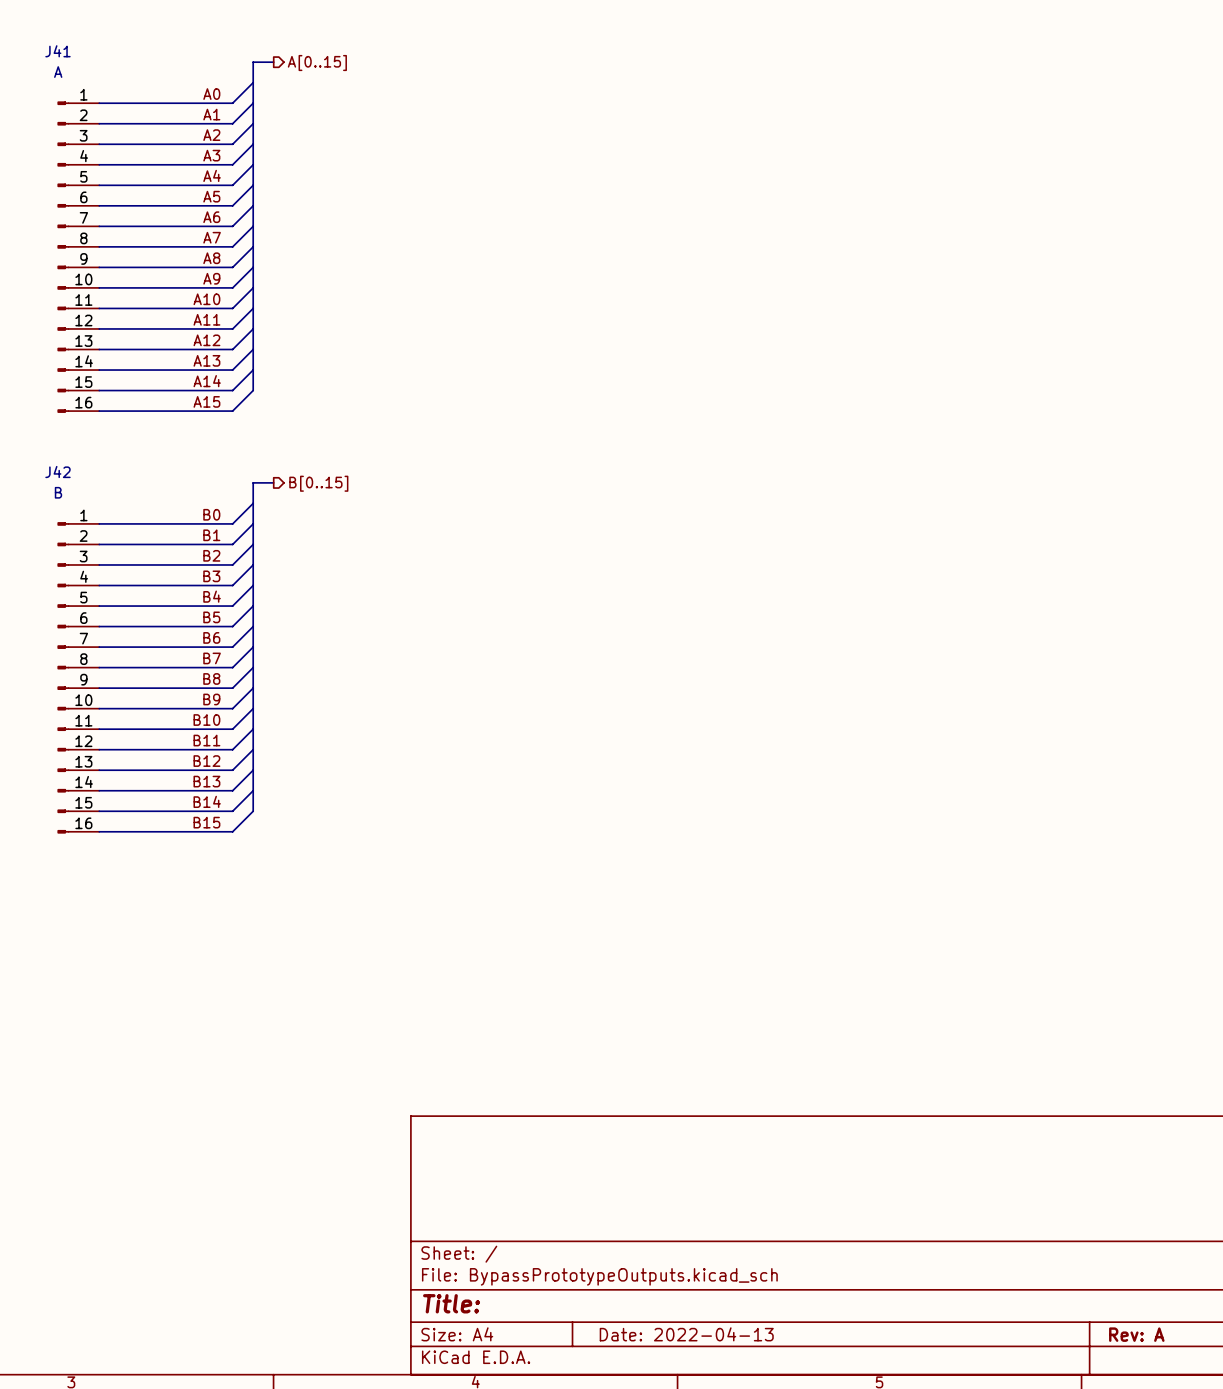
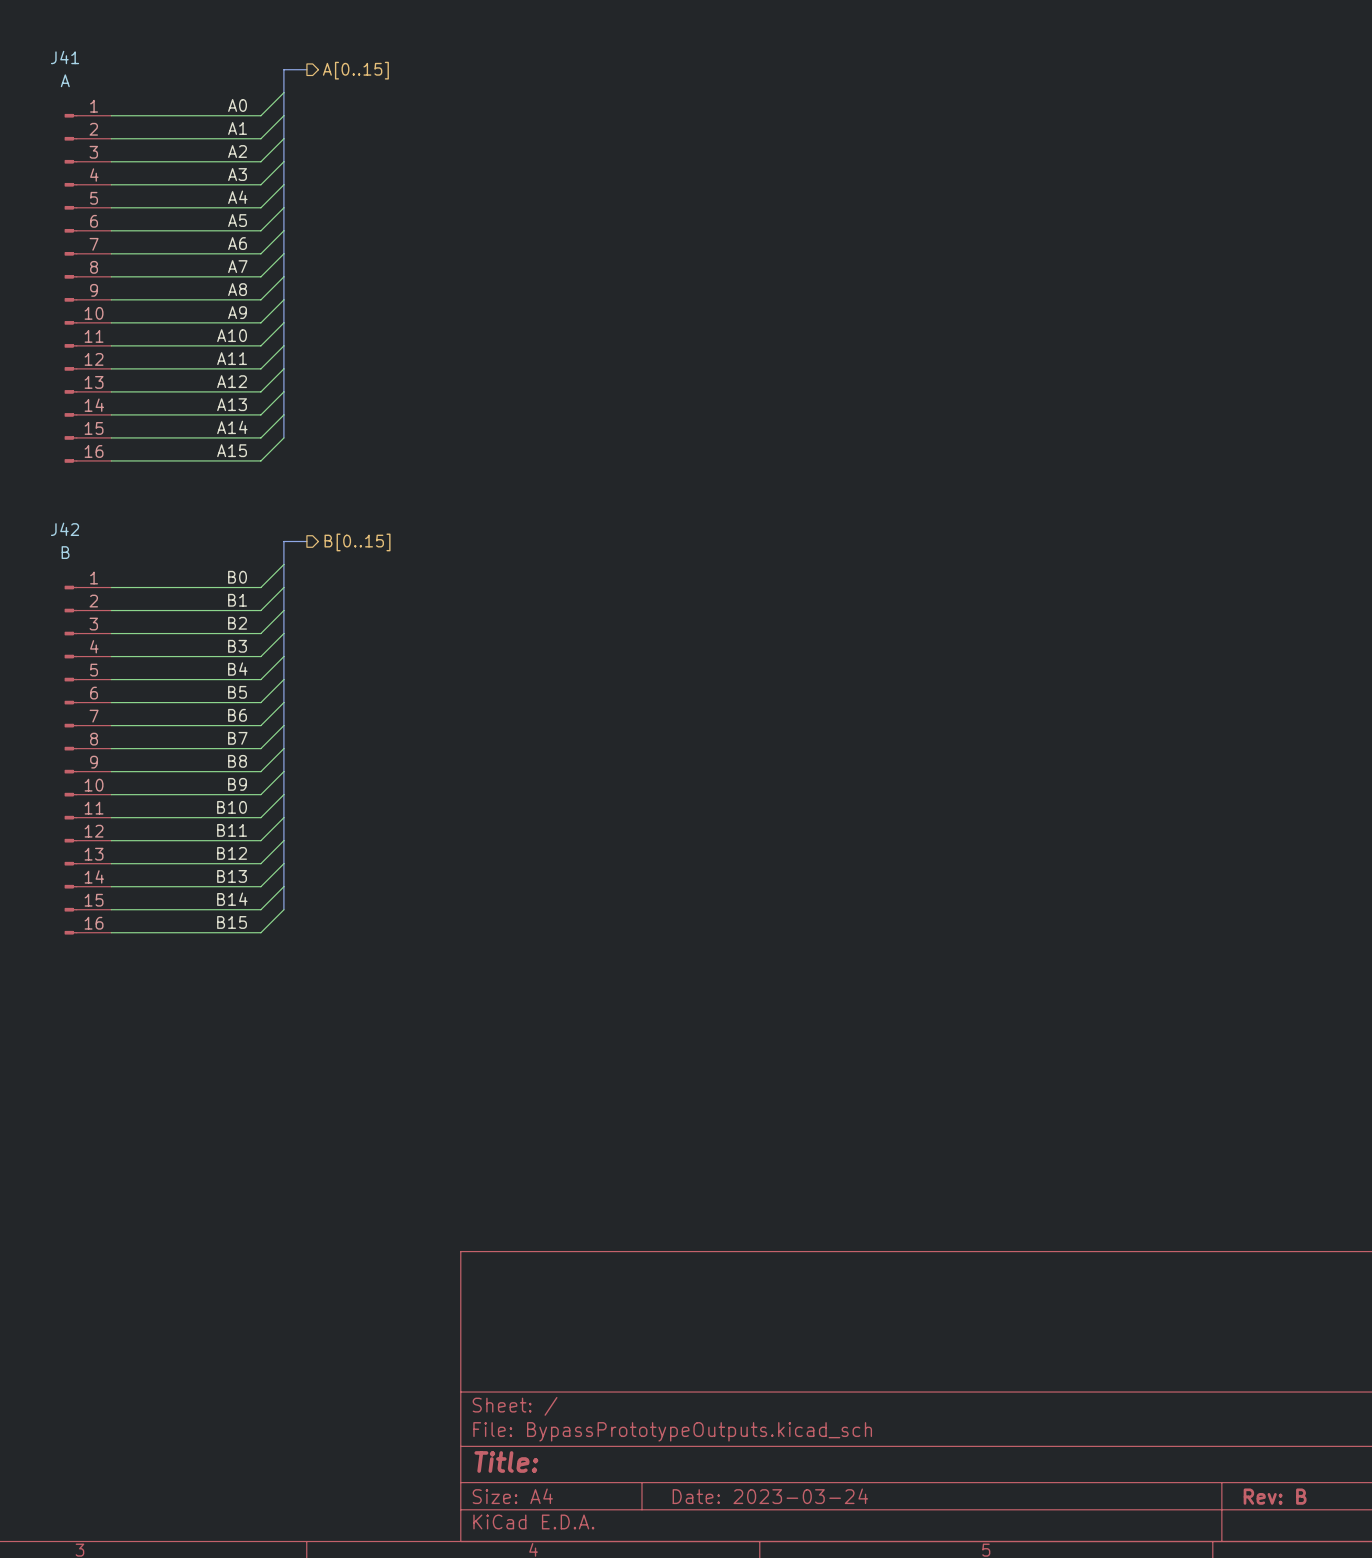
title block: Date: 2022-04-13 (686, 1334) -> Date: 2023-03-24 (770, 1496)
title block: Rev: A (1136, 1334) -> Rev: B (1275, 1496)

